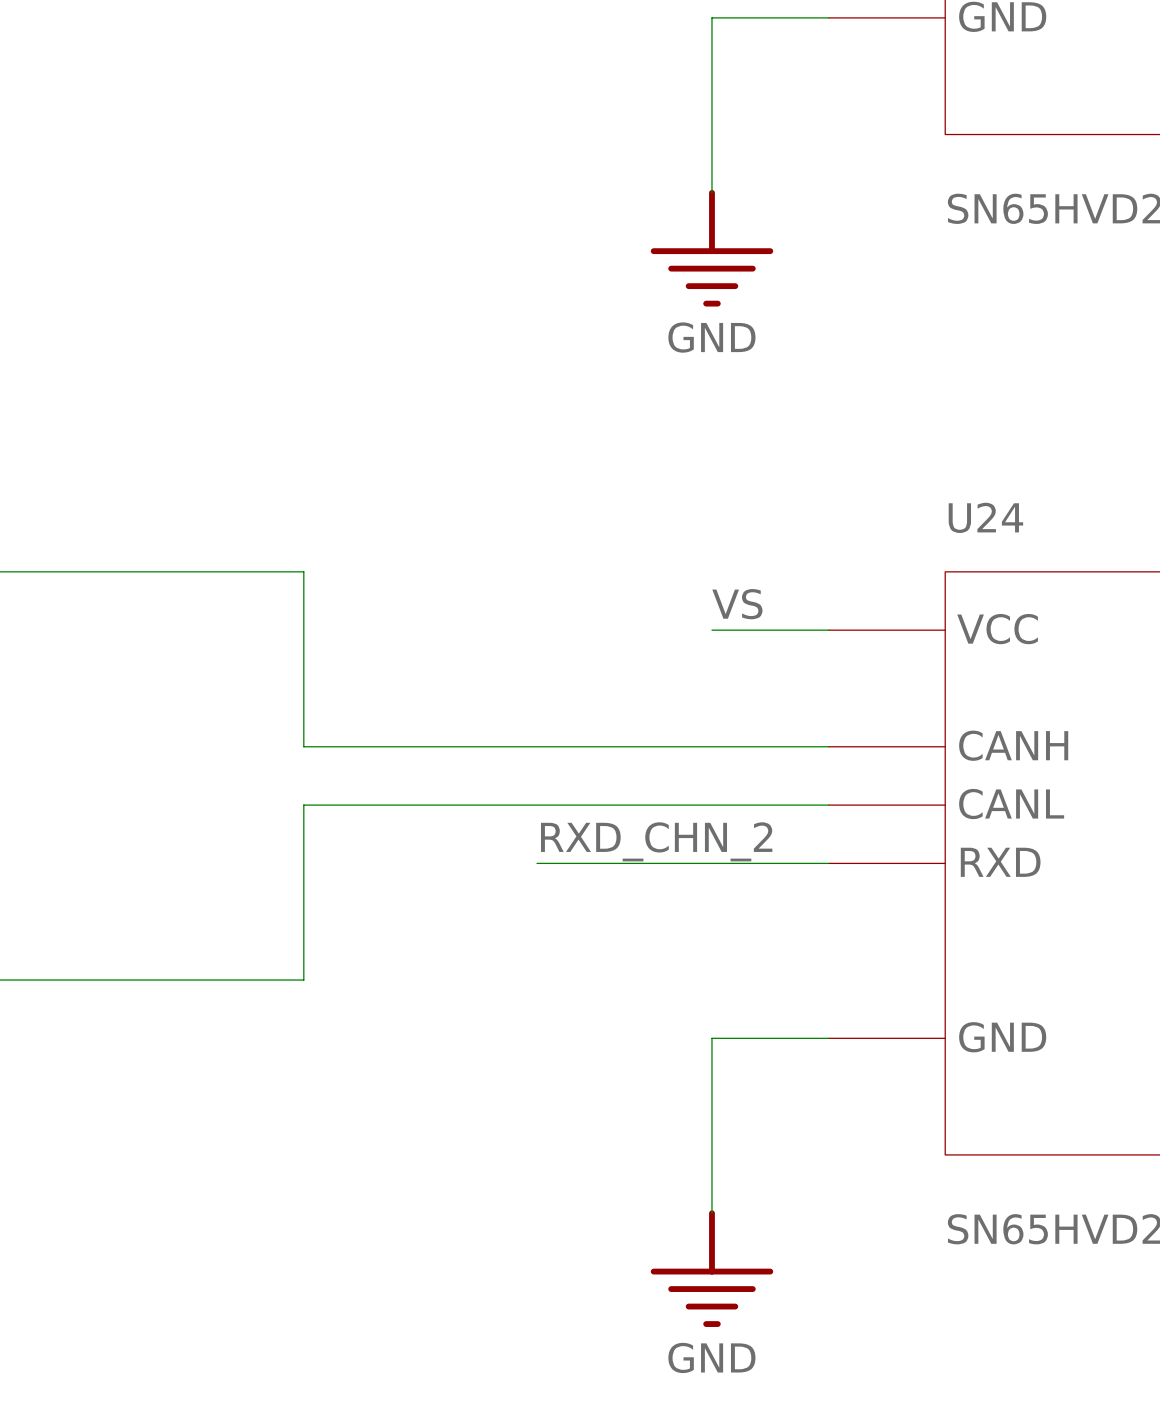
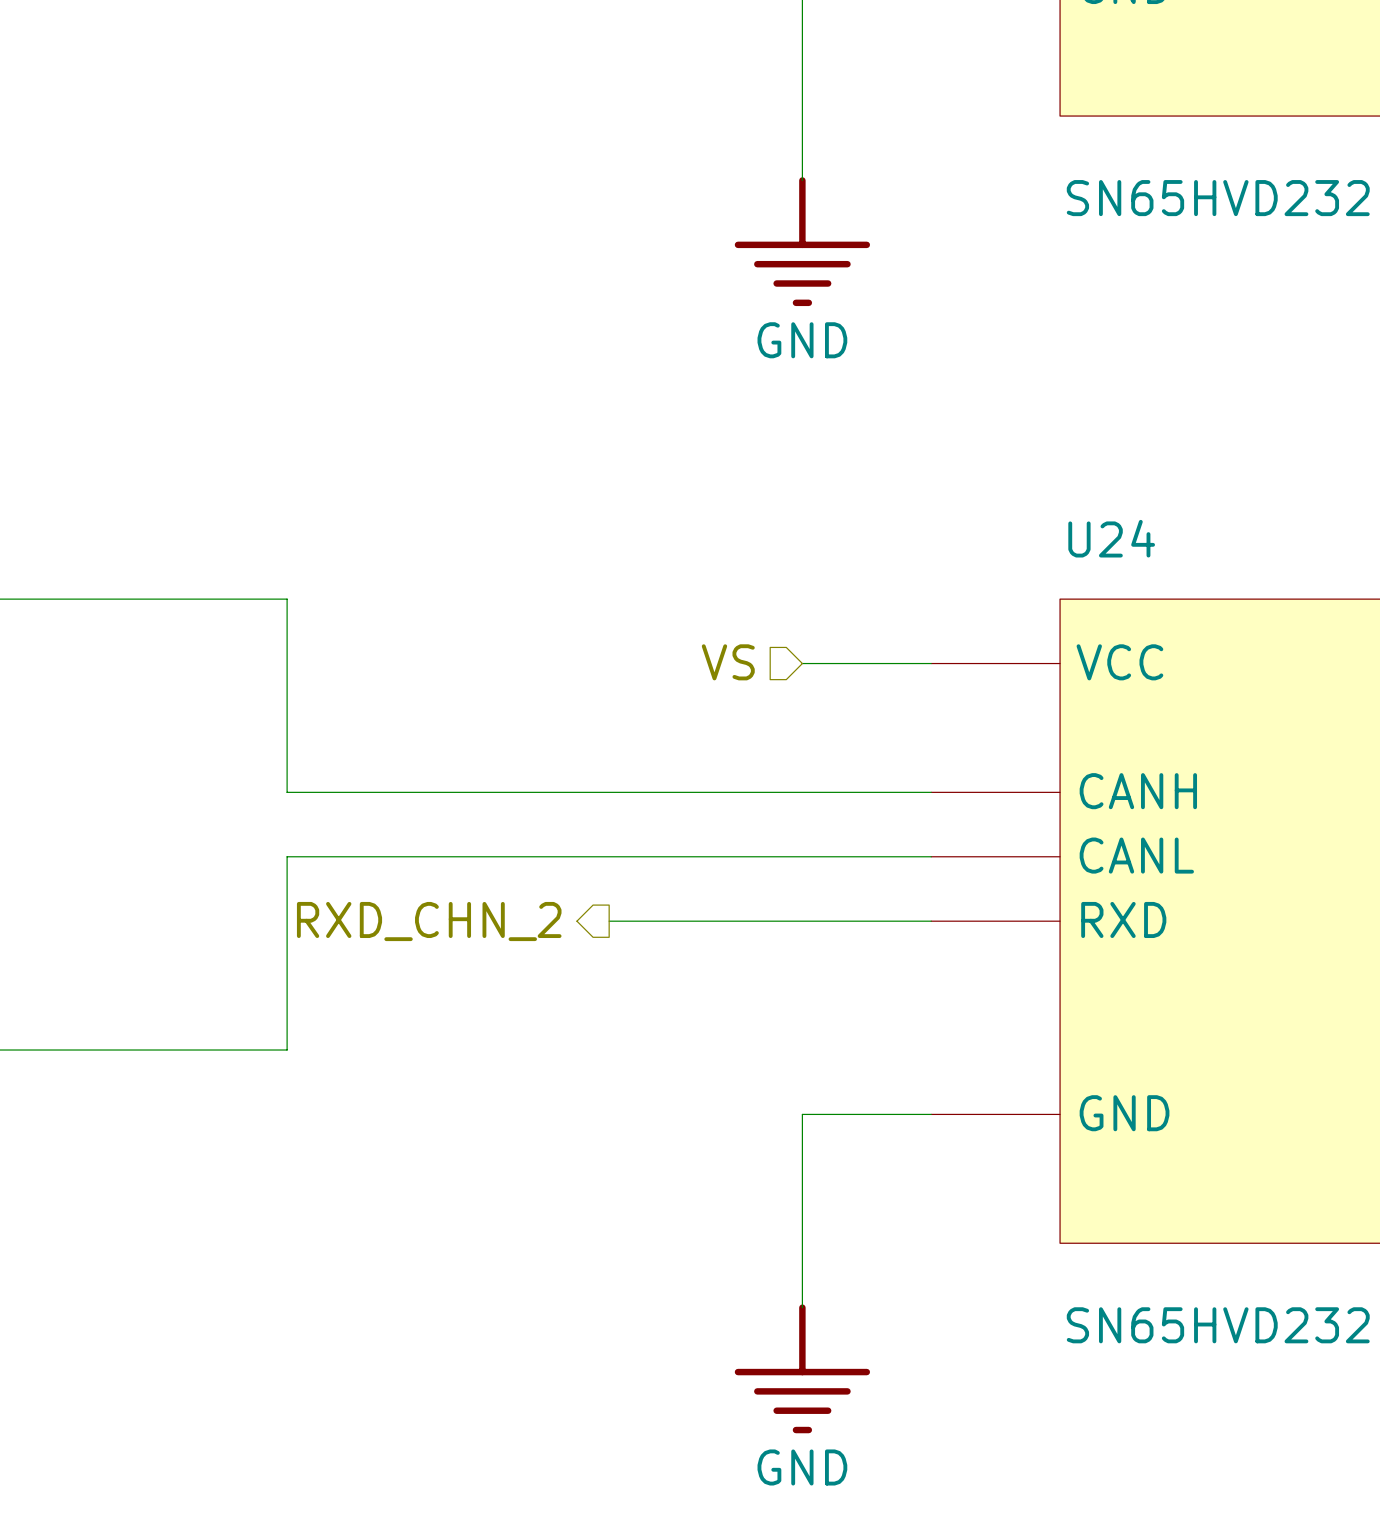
wire: (245, 571) (303, 571) (303, 746) -> (287, 599) (287, 792) (351, 792)
label: VS (737, 604) -> none
hierarchical label: none -> VS (728, 662)
wire: (303, 805) (303, 980) (245, 980) -> (351, 856) (287, 856) (287, 1050)
label: RXD_CHN_2 (656, 841) -> none
hierarchical label: none -> RXD_CHN_2 (429, 921)

